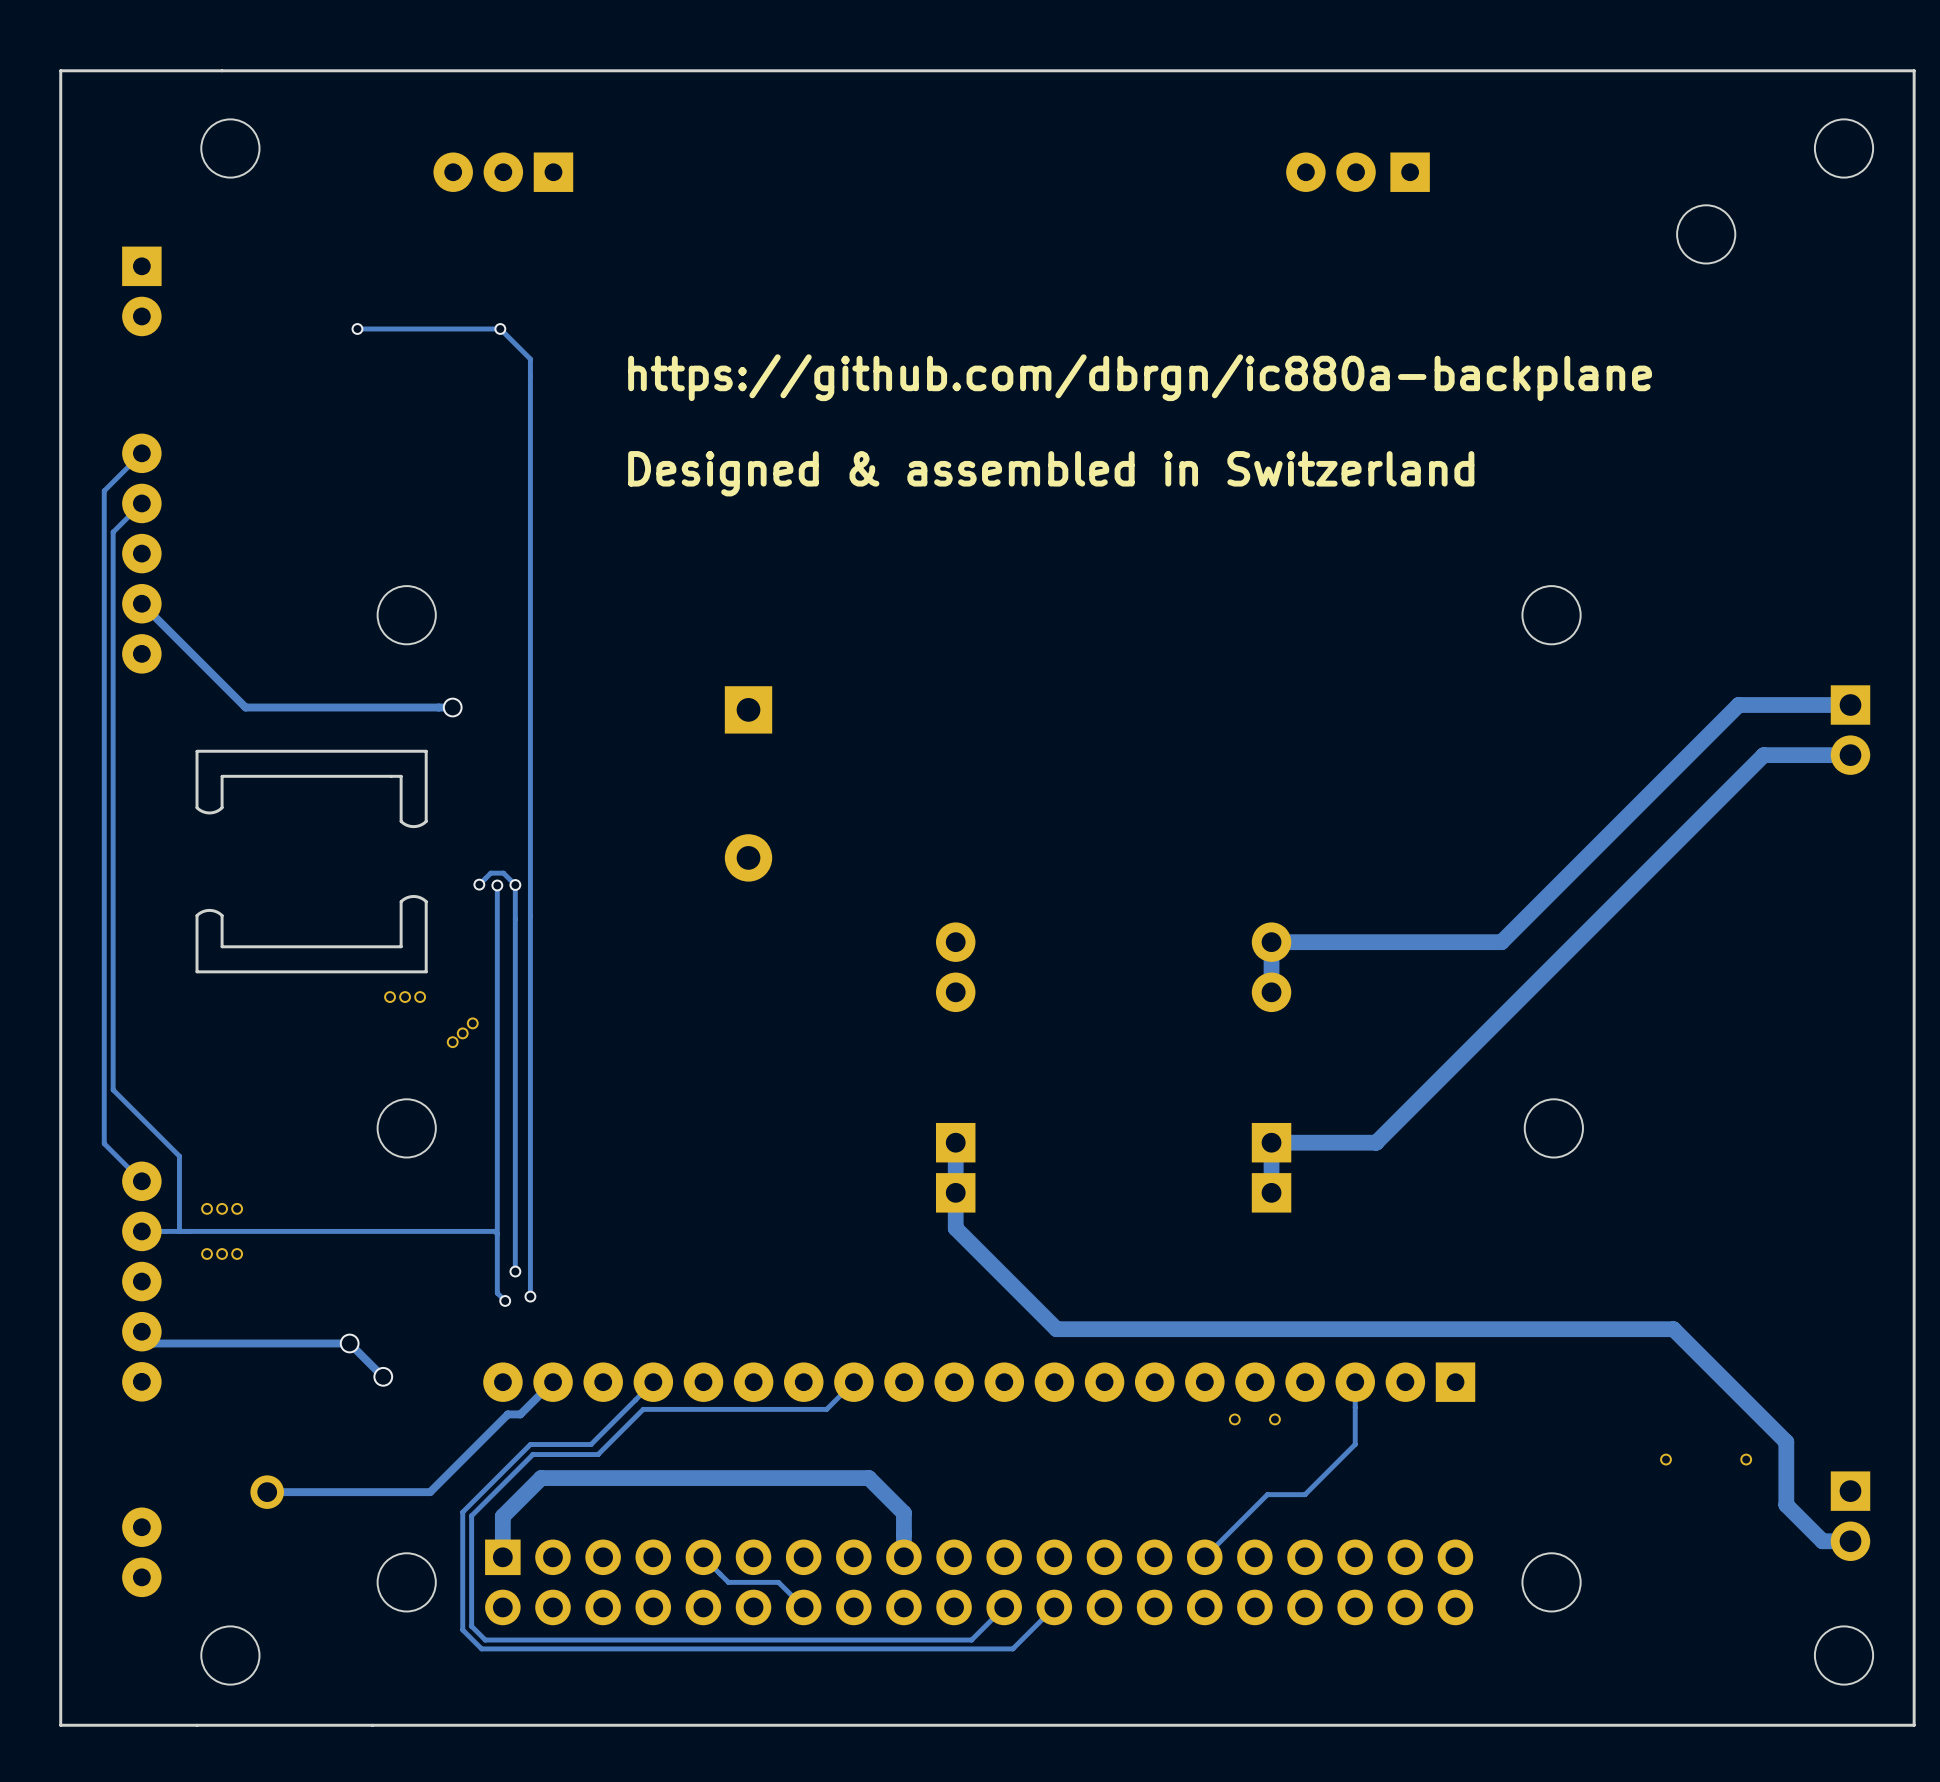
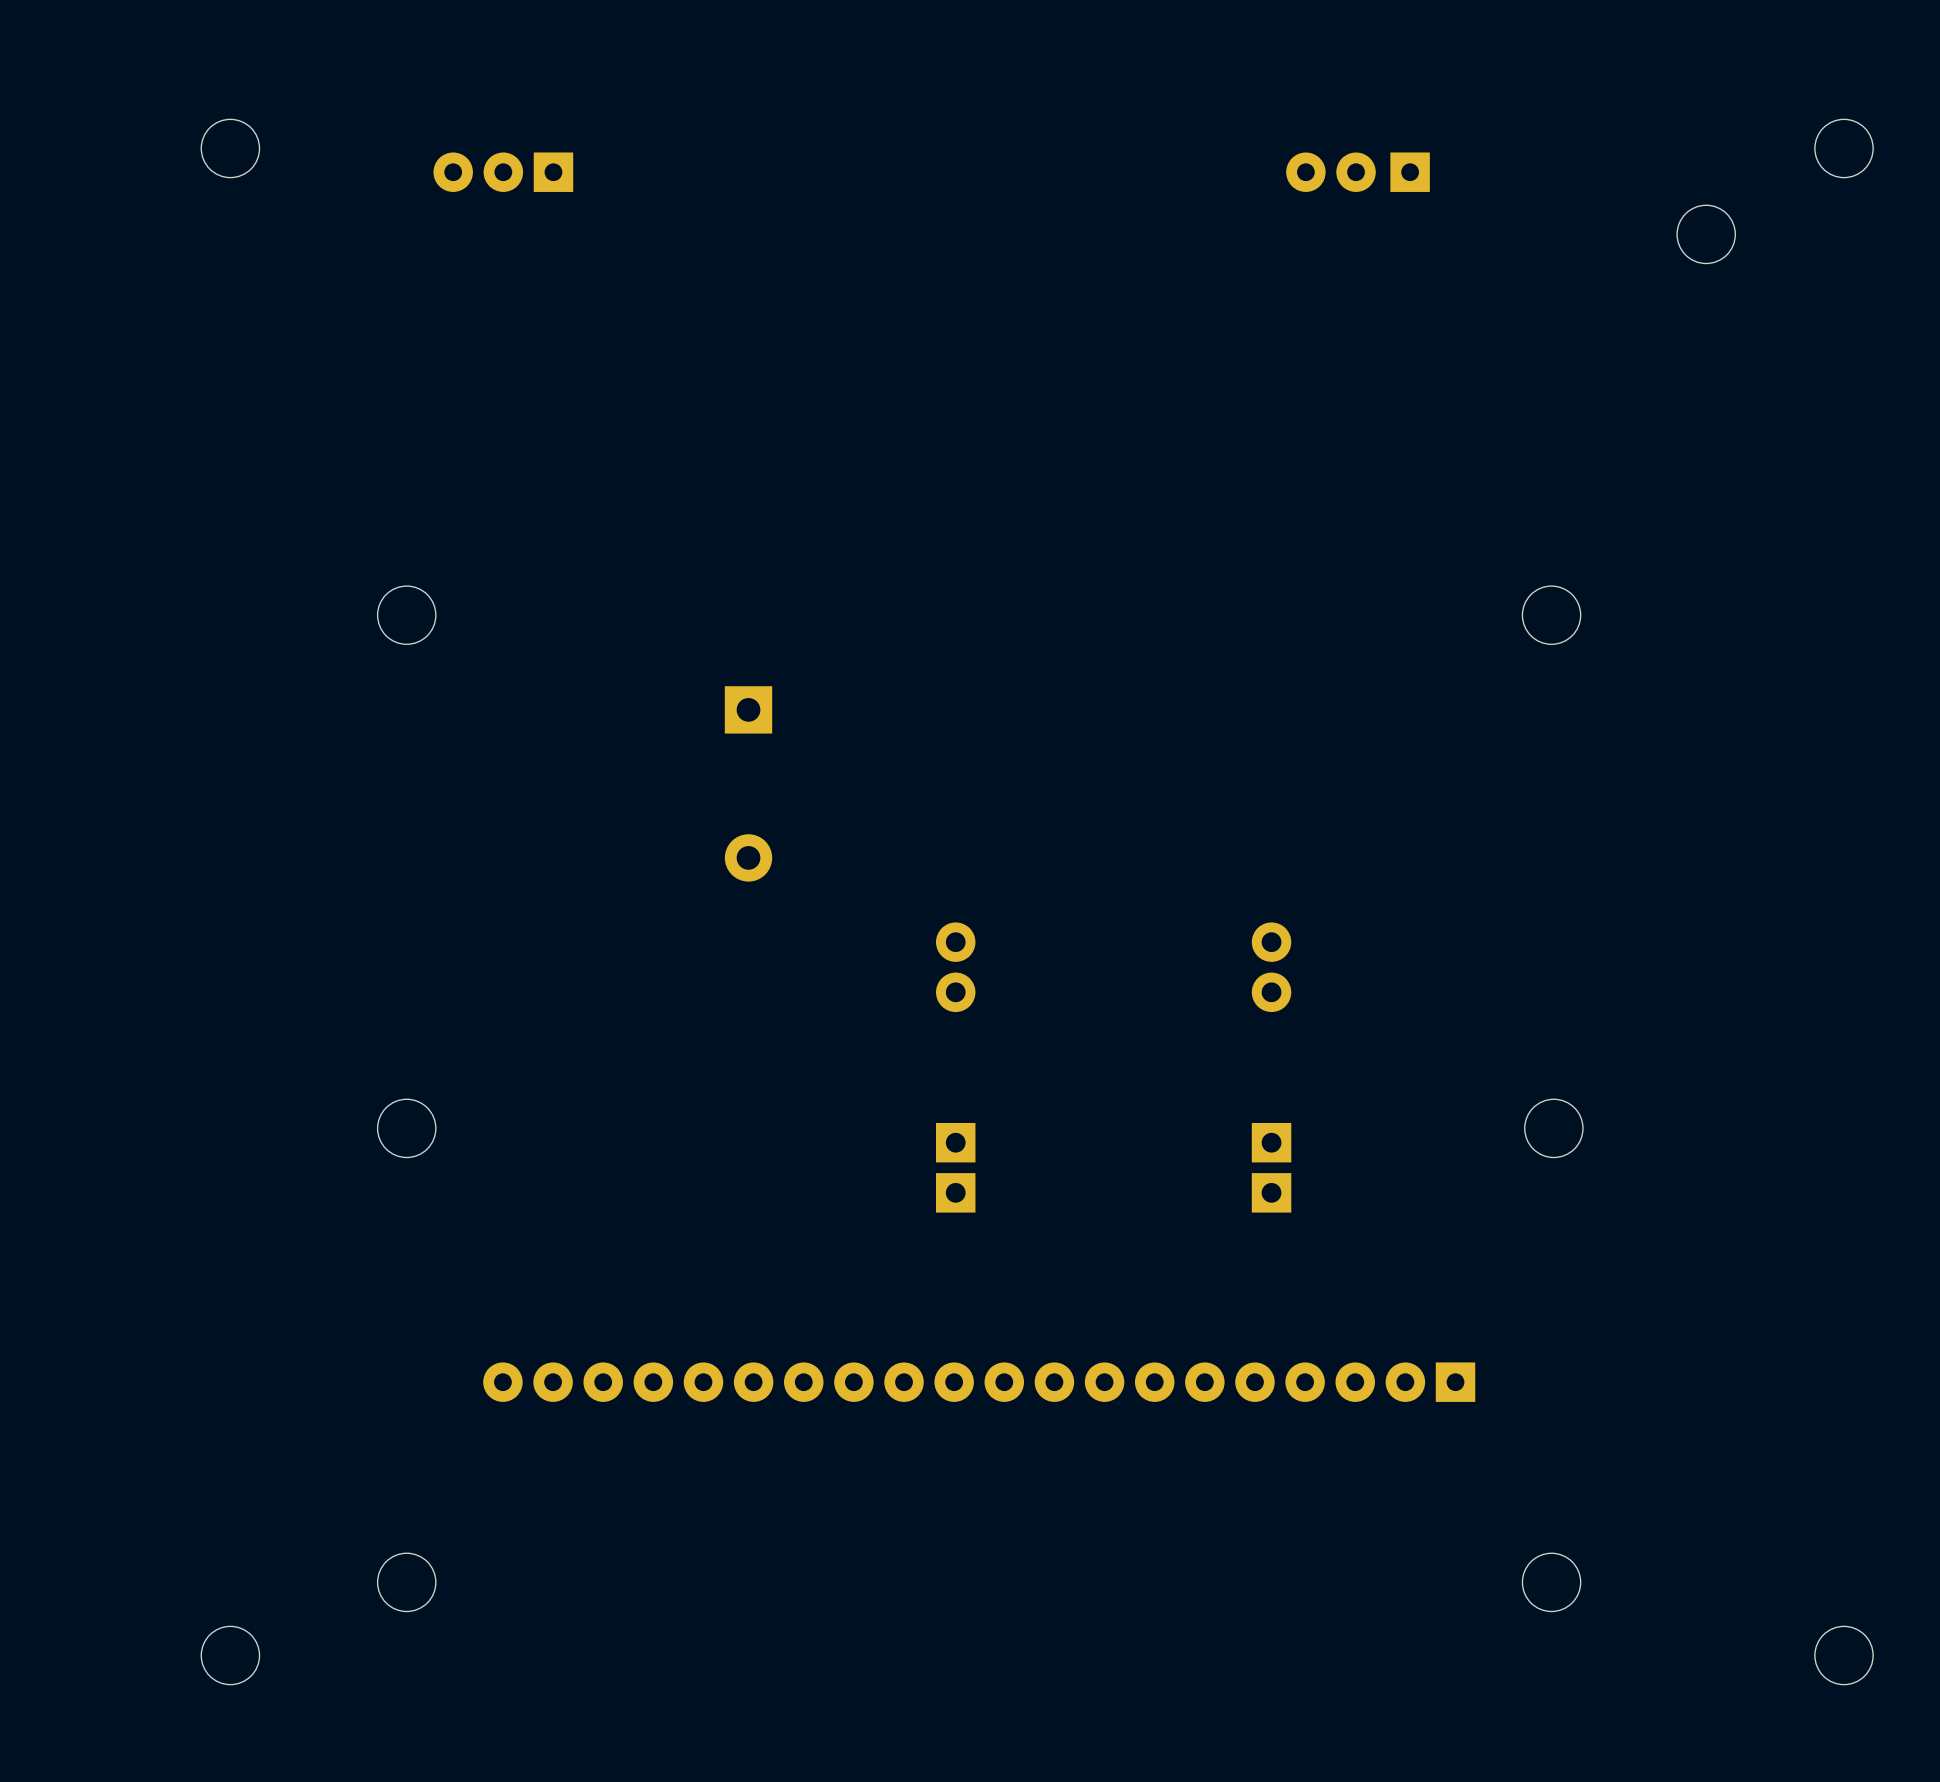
board edge: (1914, 70) (60, 70) (60, 1725) (1914, 1725) (1914, 70) -> none
part: (141, 291) -> none
track: (357, 328) (500, 328) (530, 359) (530, 1296) -> none
via: (357, 328) -> none
via: (500, 328) -> none
text: https://github.com/dbrgn/ic880a-backplane (1140, 377) -> none
track: (141, 453) (104, 490) (104, 1143) (141, 1181) -> none
text: Designed & assembled in Switzerland (1051, 473) -> none
track: (141, 503) (113, 532) (113, 1089) (179, 1156) (179, 1231) -> none
part: (141, 553) -> none
track: (141, 603) (245, 707) (452, 707) -> none
track: (1850, 705) (1738, 705) (1501, 942) (1271, 942) (1271, 992) -> none
via: (452, 707) -> none
part: (1850, 730) -> none
board edge: (197, 751) (426, 751) (426, 821) (413, 826) (401, 821) (401, 776) (222, 776) (222, 807) (214, 812) (204, 812) (197, 807) (197, 751) -> none
track: (1850, 755) (1763, 755) (1376, 1142) (1271, 1142) (1271, 1192) -> none
track: (479, 884) (490, 873) (503, 873) (515, 884) -> none
via: (479, 884) -> none
via: (515, 884) -> none
via: (497, 885) -> none
track: (515, 885) (515, 1271) -> none
track: (495, 887) (497, 885) (497, 1293) (505, 1300) -> none
board edge: (426, 901) (426, 971) (197, 971) (197, 915) (204, 910) (214, 910) (222, 915) (222, 946) (401, 946) (401, 901) (413, 896) (426, 901) -> none
part: (390, 997) -> none
part: (405, 997) -> none
part: (420, 997) -> none
part: (472, 1023) -> none
part: (462, 1033) -> none
part: (452, 1042) -> none
track: (955, 1142) (955, 1228) (1056, 1329) (1673, 1329) (1786, 1442) (1786, 1504) (1822, 1541) (1850, 1541) -> none
part: (207, 1208) -> none
part: (222, 1208) -> none
part: (237, 1208) -> none
track: (141, 1231) (494, 1231) (497, 1233) -> none
part: (207, 1253) -> none
part: (222, 1253) -> none
part: (237, 1253) -> none
via: (515, 1271) -> none
part: (141, 1281) -> none
via: (530, 1296) -> none
via: (505, 1300) -> none
track: (141, 1331) (153, 1343) (349, 1343) (383, 1376) -> none
via: (349, 1343) -> none
via: (383, 1376) -> none
track: (553, 1382) (520, 1414) (507, 1414) (430, 1492) (267, 1492) -> none
track: (653, 1382) (591, 1444) (530, 1444) (462, 1512) (462, 1630) (481, 1648) (1012, 1648) (1054, 1607) -> none
track: (853, 1382) (826, 1409) (643, 1409) (598, 1454) (532, 1454) (471, 1515) (471, 1626) (485, 1640) (971, 1640) (1004, 1607) -> none
track: (1355, 1382) (1355, 1444) (1305, 1494) (1267, 1494) (1204, 1557) -> none
part: (1234, 1419) -> none
part: (1274, 1419) -> none
part: (1665, 1459) -> none
part: (1746, 1459) -> none
part: (267, 1492) -> none
part: (1850, 1516) -> none
part: (141, 1552) -> none
track: (703, 1557) (728, 1582) (778, 1582) (803, 1607) -> none
track: (903, 1557) (903, 1513) (868, 1478) (541, 1478) (502, 1516) (502, 1557) -> none
part: (979, 1582) -> none

